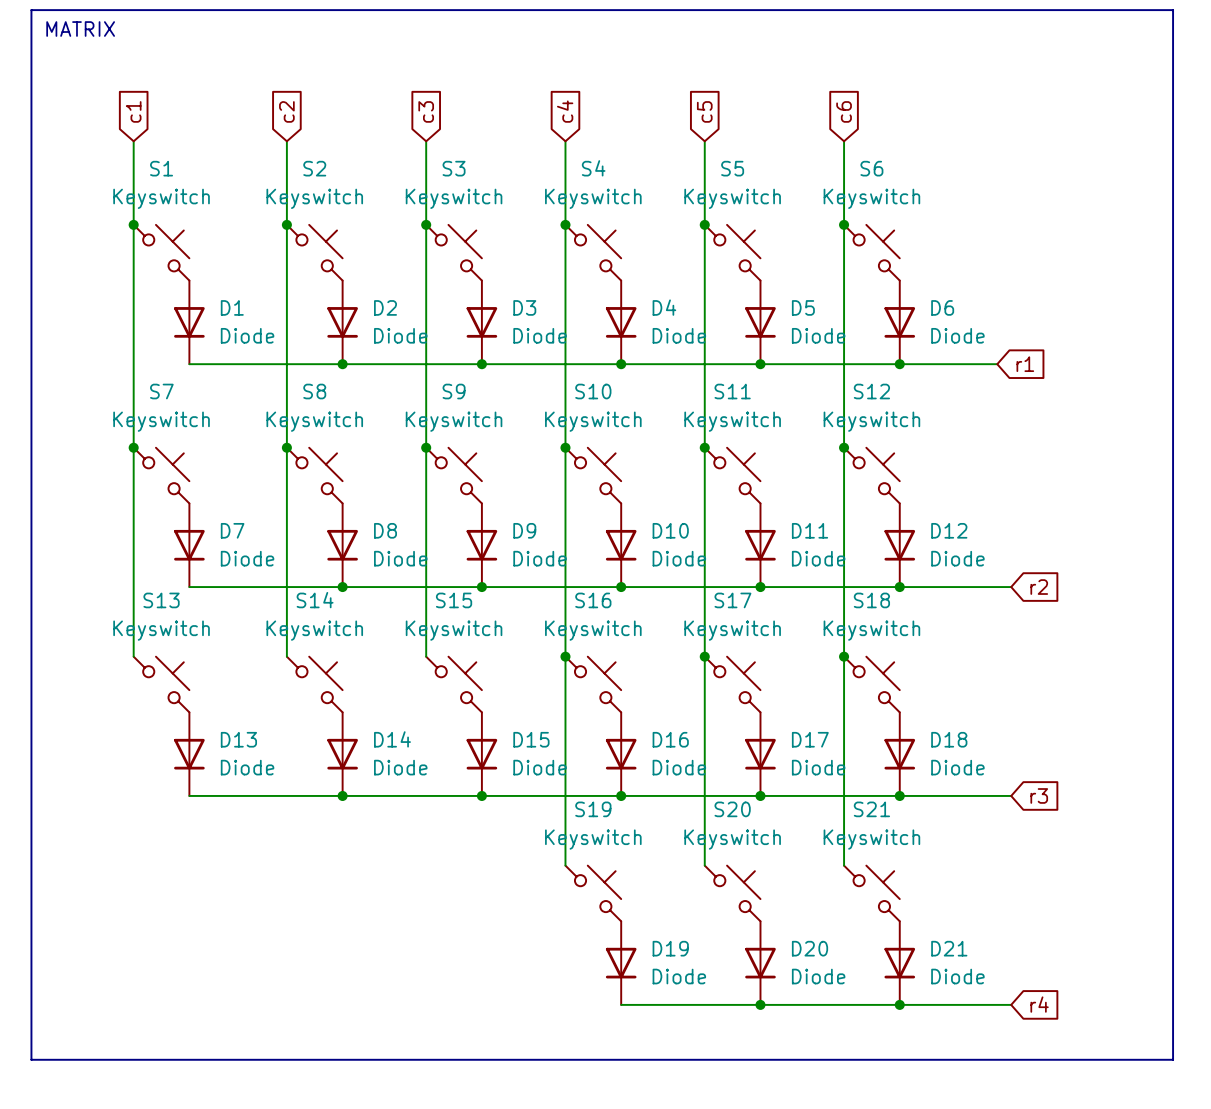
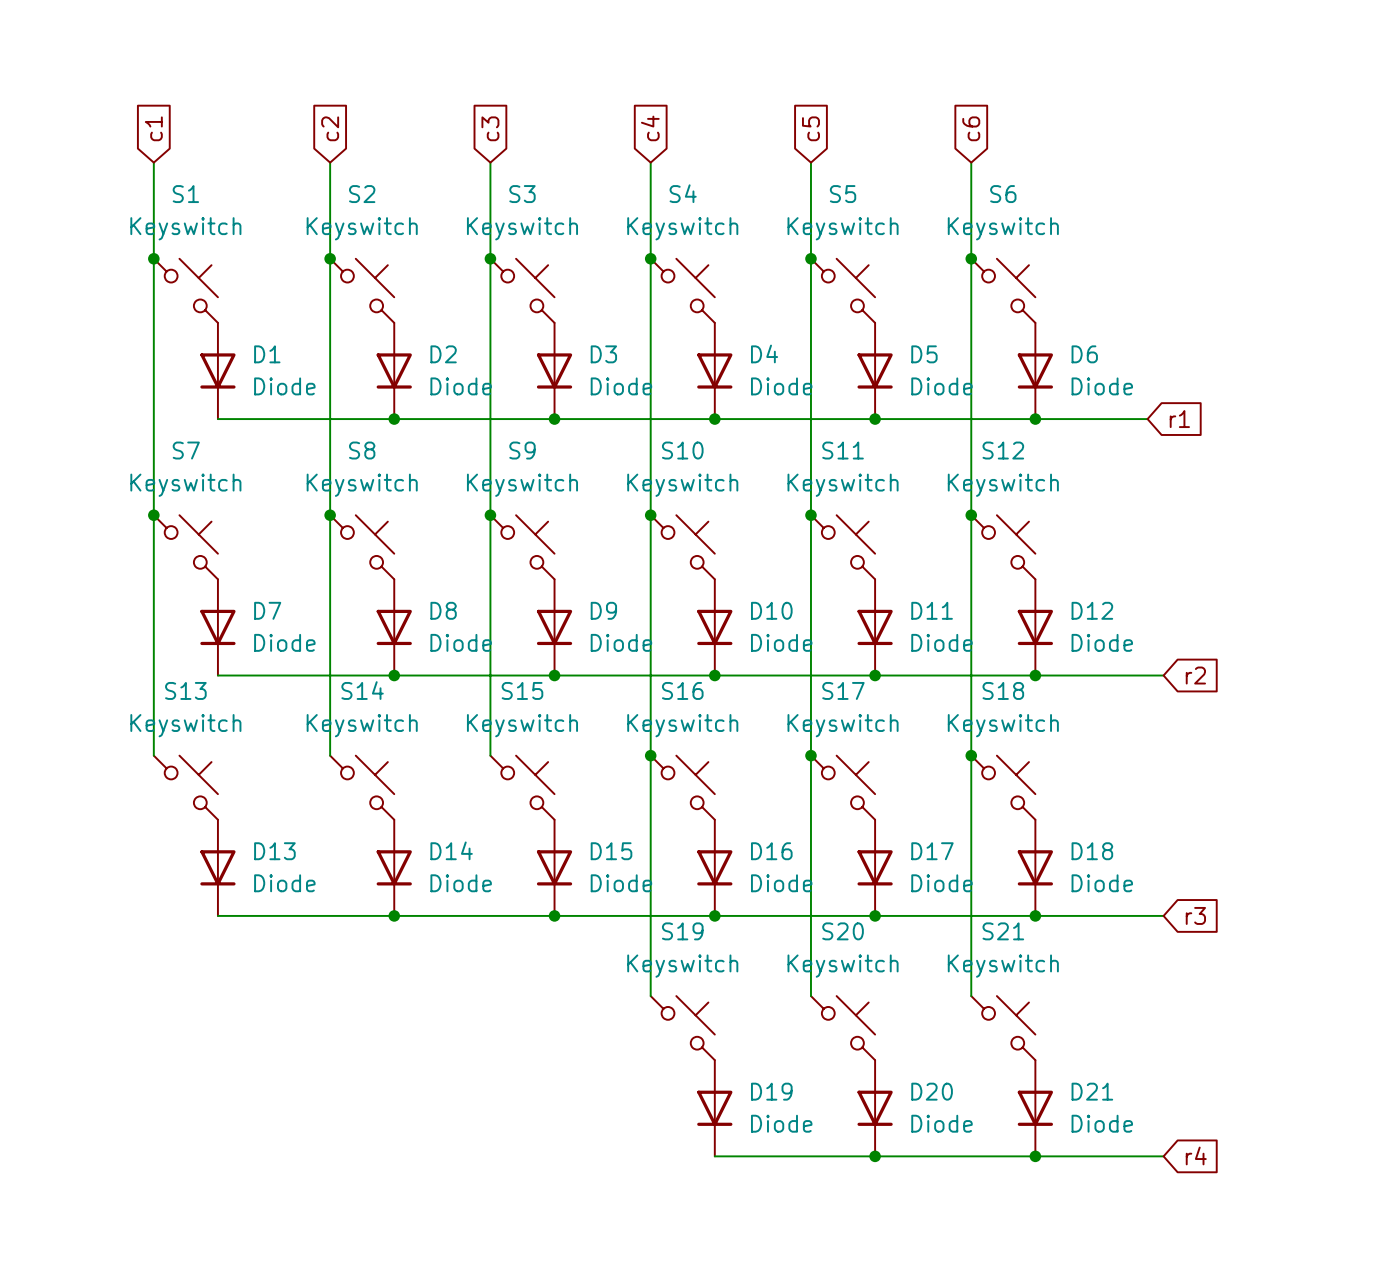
line: (31, 10) (1173, 10) (1173, 1059) (31, 1059) (31, 10) -> none
text: MATRIX (80, 29) -> none

